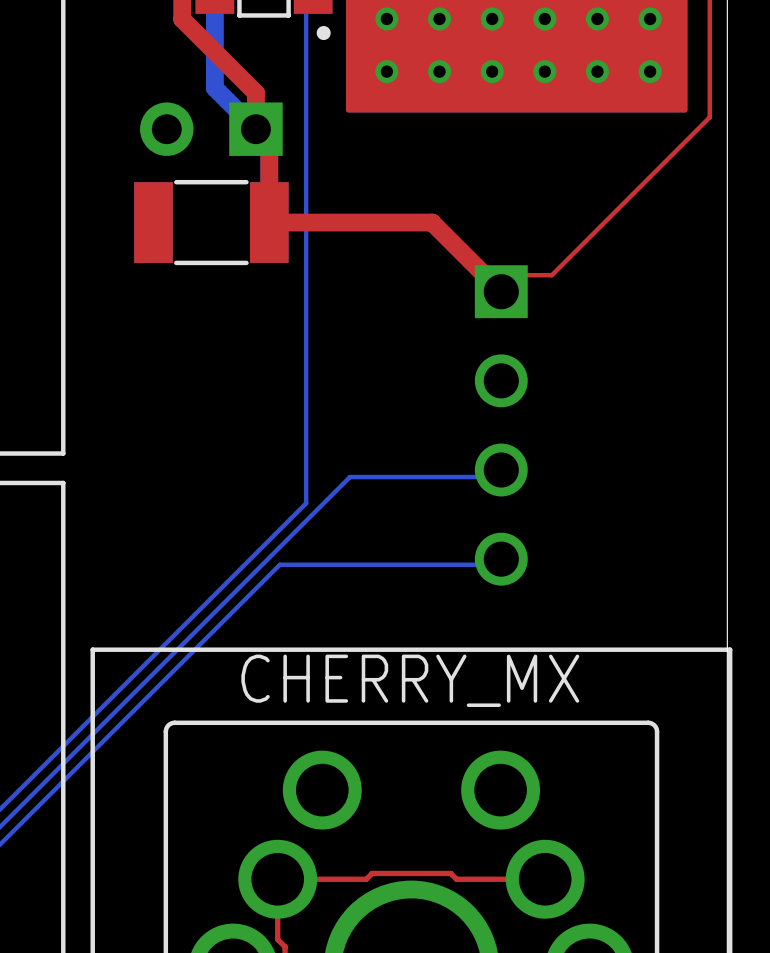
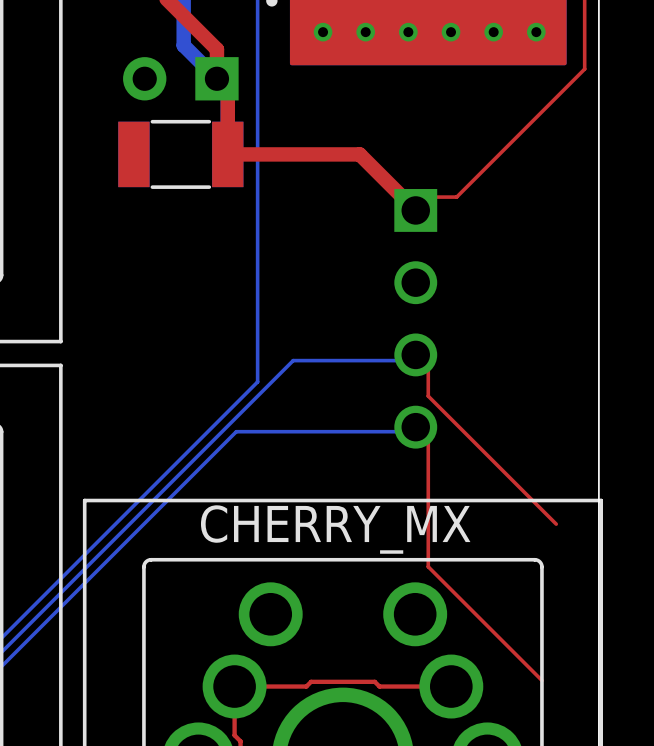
top track: none -> (415, 354) (428, 367) (428, 396) (556, 524)
top track: none -> (415, 427) (428, 438) (428, 566) (542, 680)

